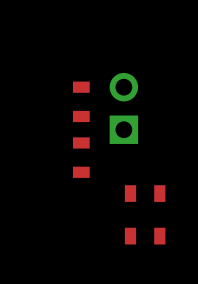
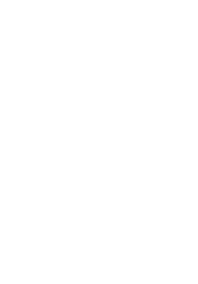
part: (81, 101) -> none
part: (123, 108) -> none
part: (81, 157) -> none
part: (145, 193) -> none
part: (145, 236) -> none

